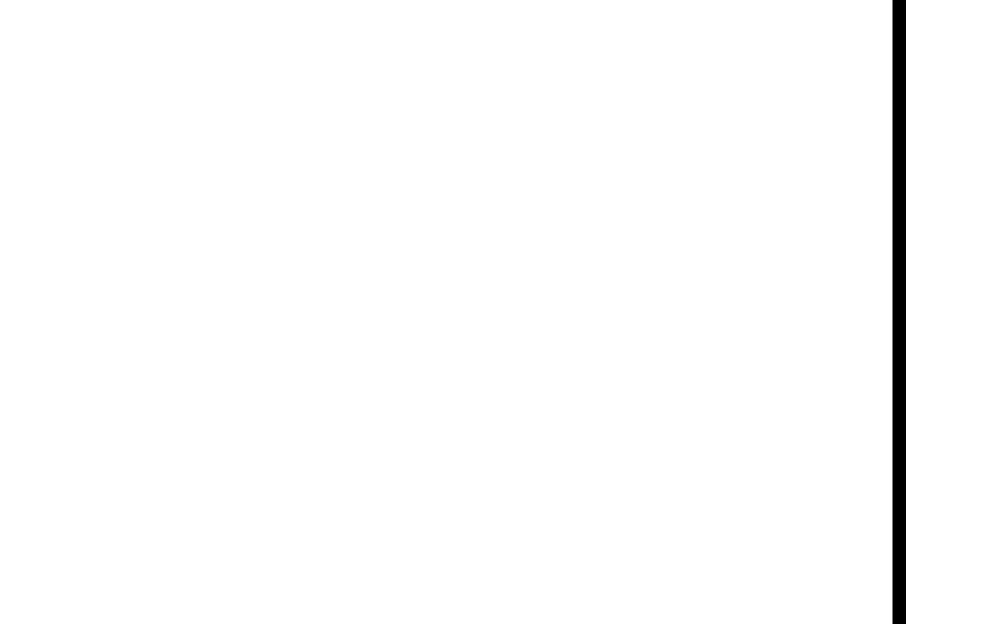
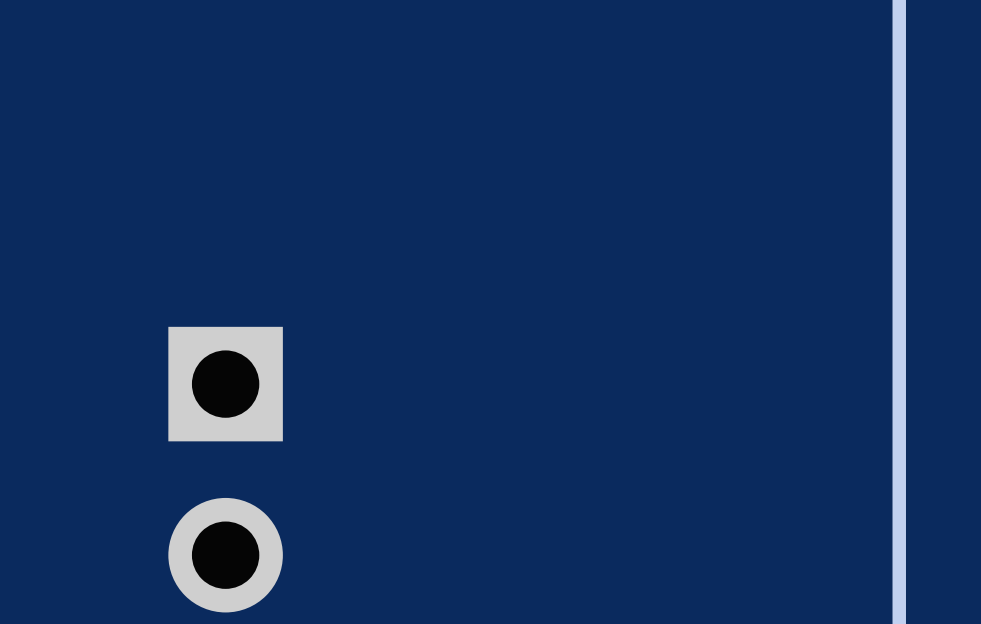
part: none -> (225, 469)

